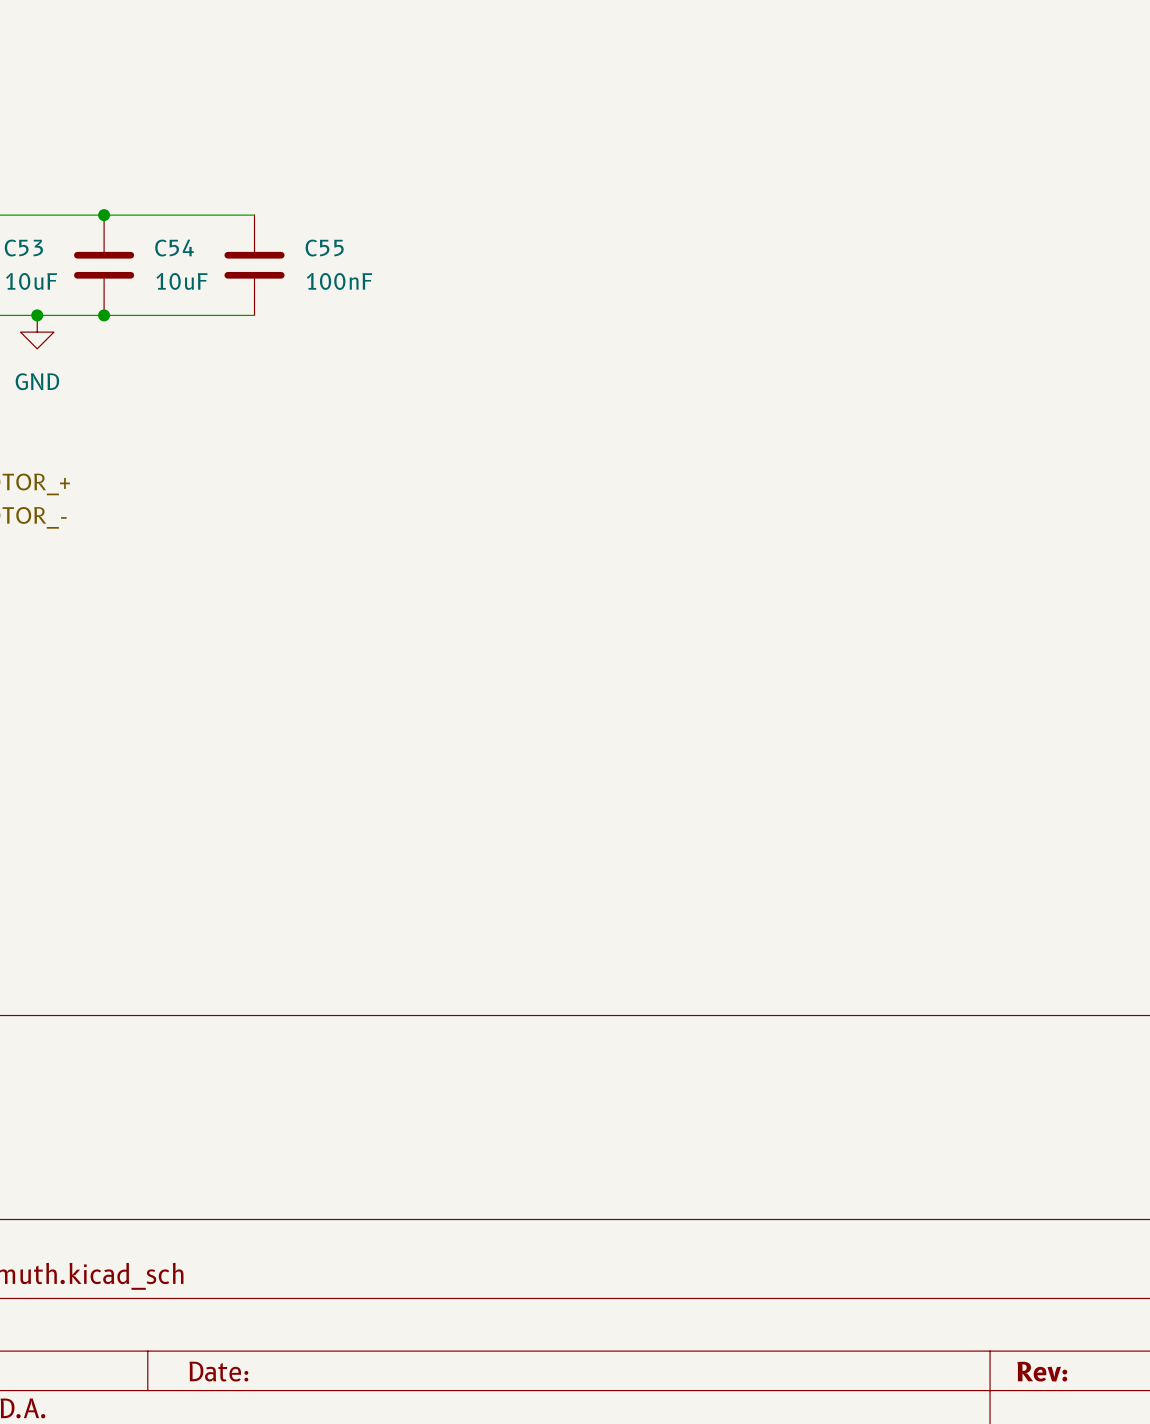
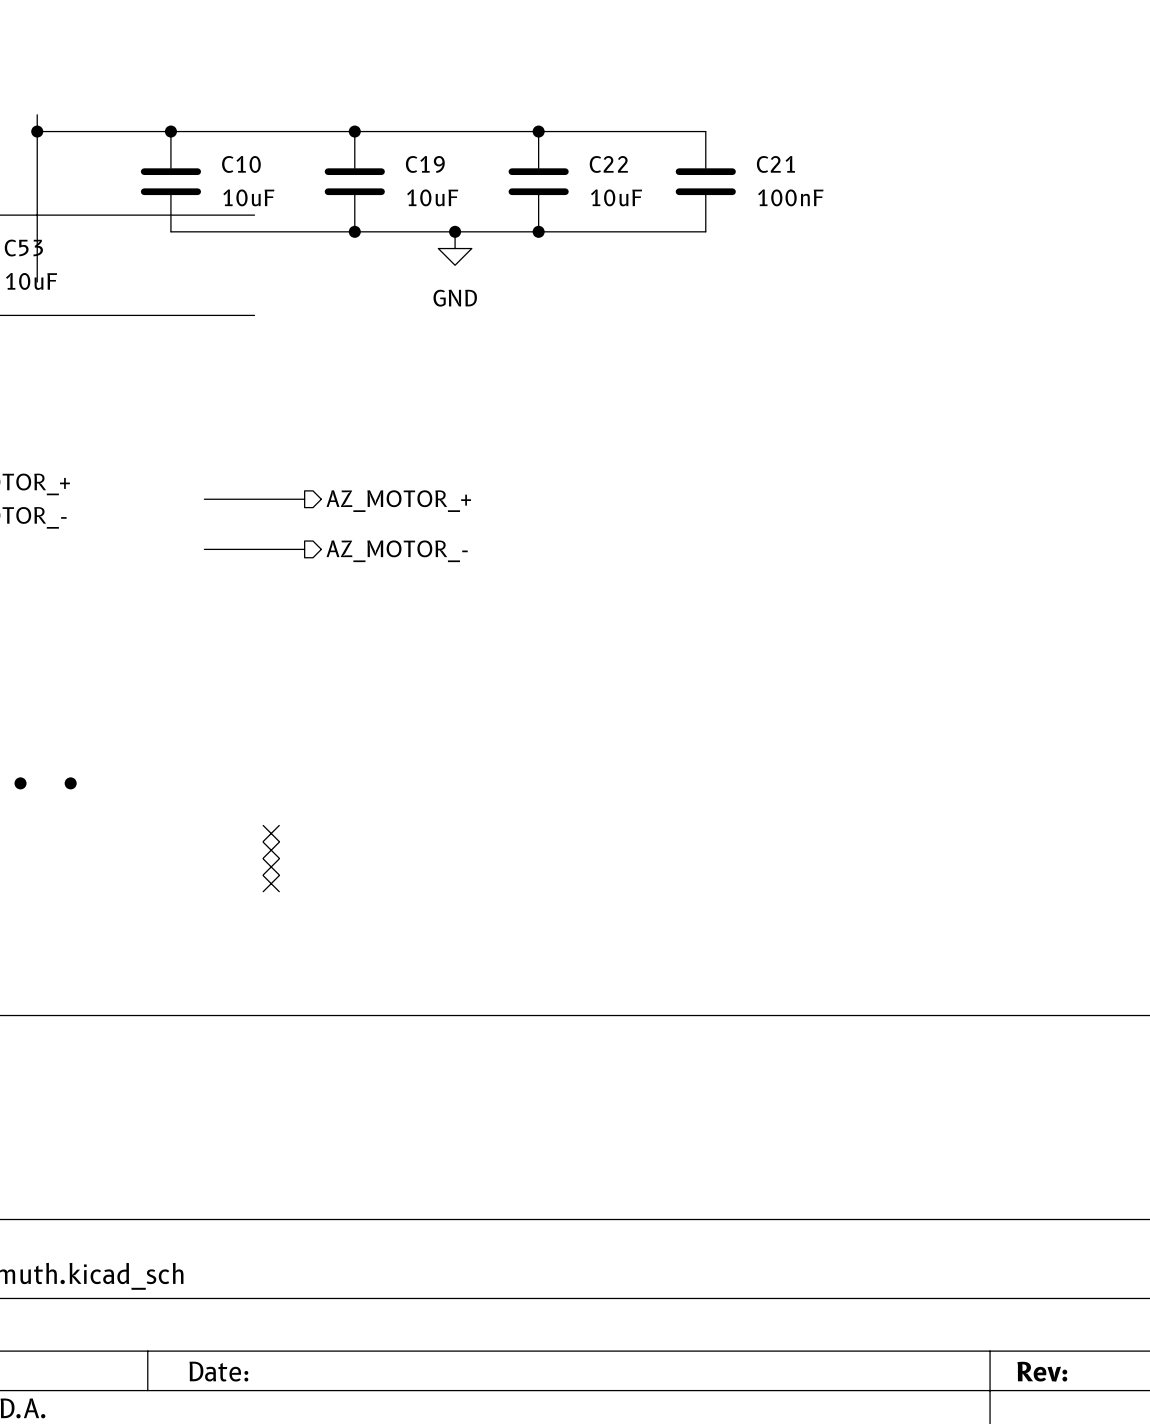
wire: none -> (37, 114) (37, 281)
wire: none -> (37, 131) (705, 131)
junction: none -> (37, 131)
junction: none -> (170, 131)
junction: none -> (354, 131)
junction: none -> (538, 131)
C10: none -> 10uF (170, 181)
C19: none -> 10uF (354, 181)
C22: none -> 10uF (538, 181)
C21: none -> 100nF (705, 181)
junction: (104, 215) -> none
wire: none -> (170, 231) (705, 231)
junction: none -> (354, 231)
junction: none -> (455, 231)
junction: none -> (538, 231)
power symbol: none -> GND (455, 248)
C54: 10uF (104, 265) -> none
C55: 100nF (254, 265) -> none
junction: (37, 315) -> none
junction: (104, 315) -> none
power symbol: GND (37, 332) -> none
wire: none -> (204, 499) (304, 499)
hierarchical label: none -> AZ_MOTOR_+ (398, 501)
wire: none -> (204, 549) (304, 549)
hierarchical label: none -> AZ_MOTOR_- (397, 551)
junction: none -> (20, 783)
junction: none -> (70, 783)
no-connect mark: none -> (271, 833)
no-connect mark: none -> (271, 850)
no-connect mark: none -> (271, 866)
no-connect mark: none -> (271, 883)

